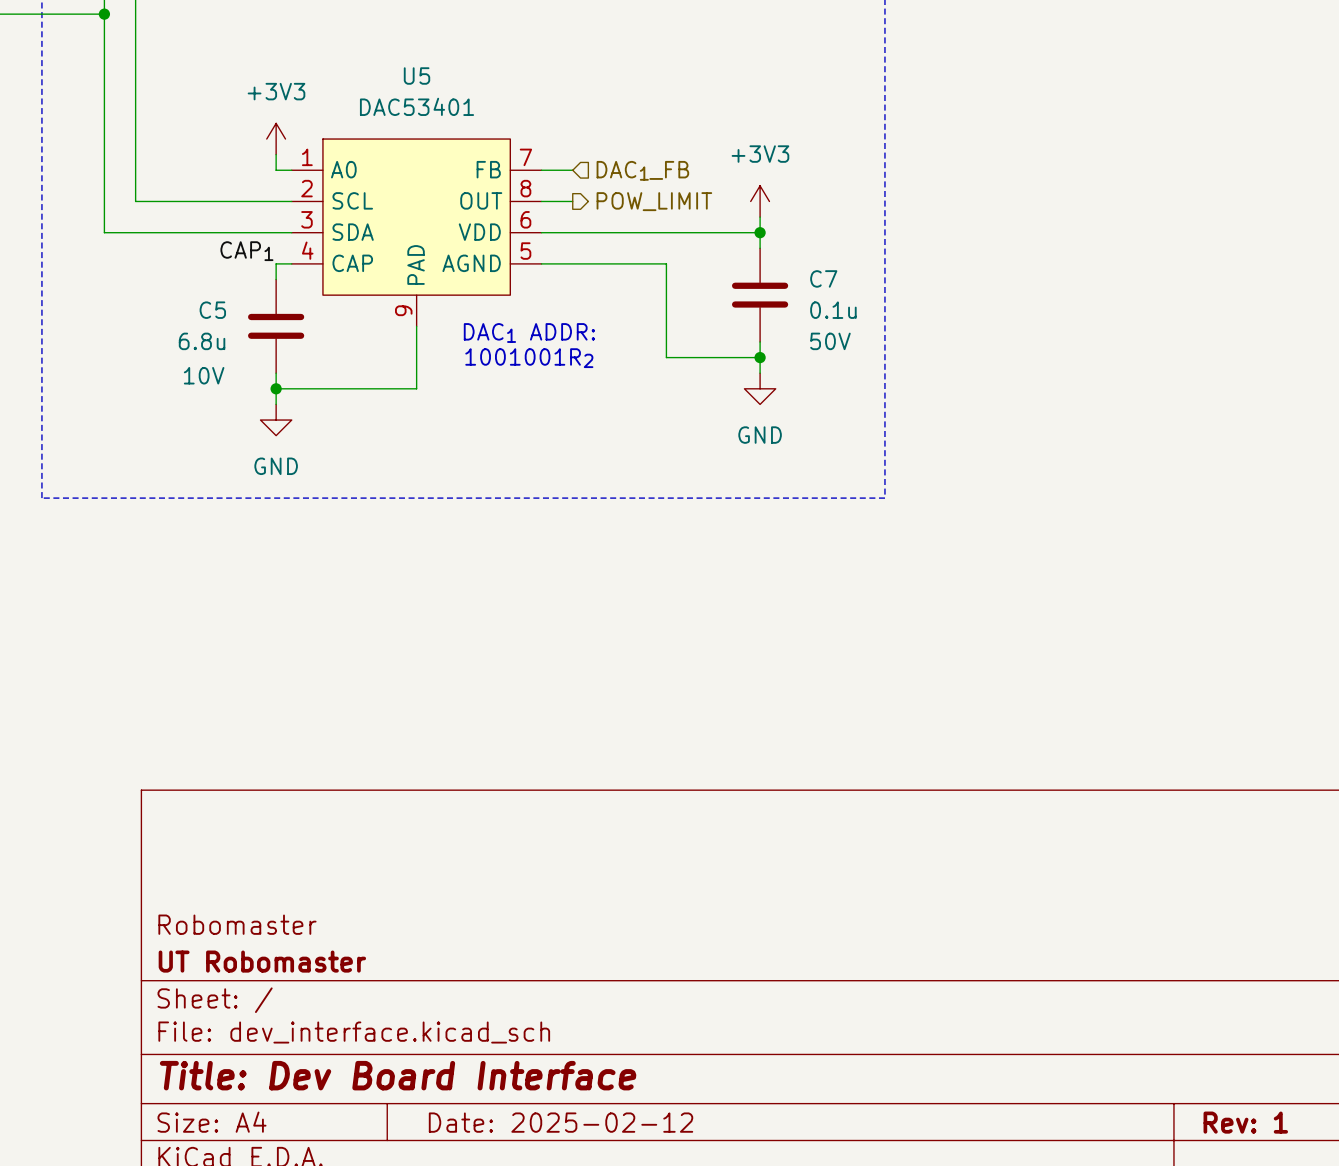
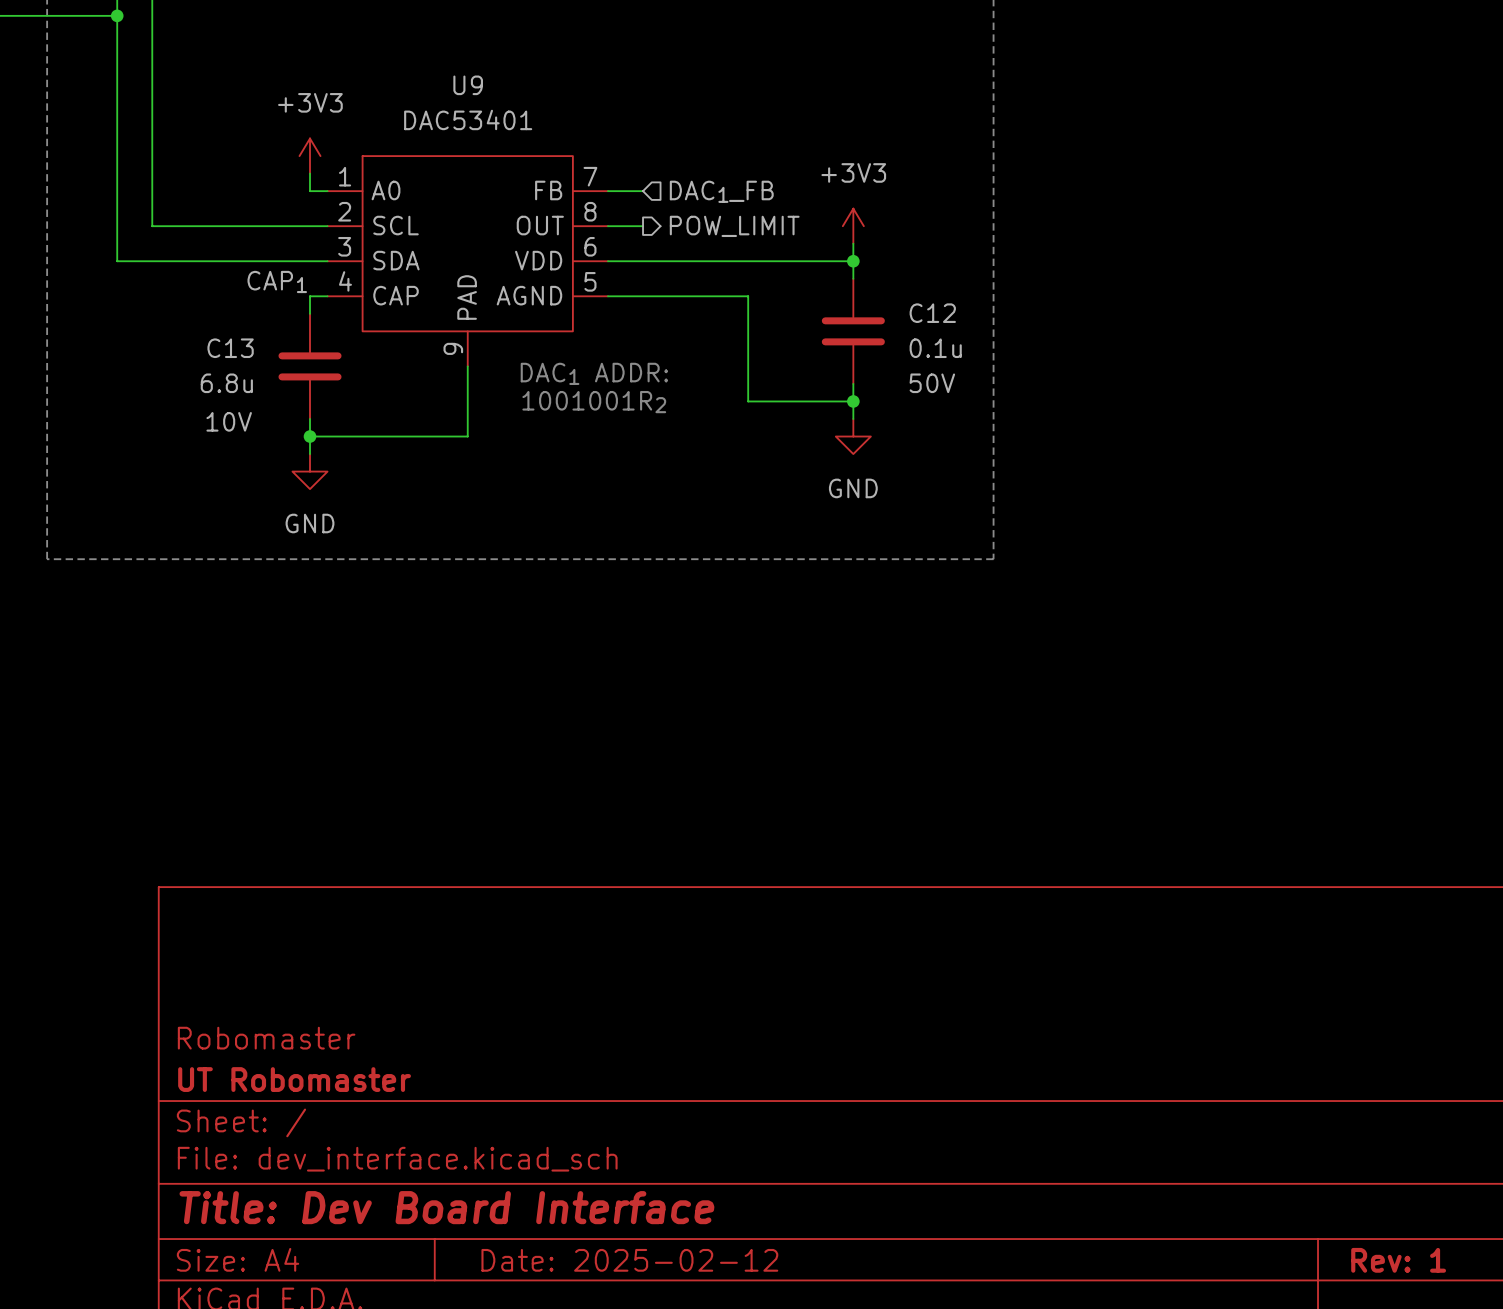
U5 name: U5 (417, 76) -> U9 (468, 85)
C7 name: C7 (823, 278) -> C12 (932, 313)
C5 name: C5 (212, 310) -> C13 (230, 348)

